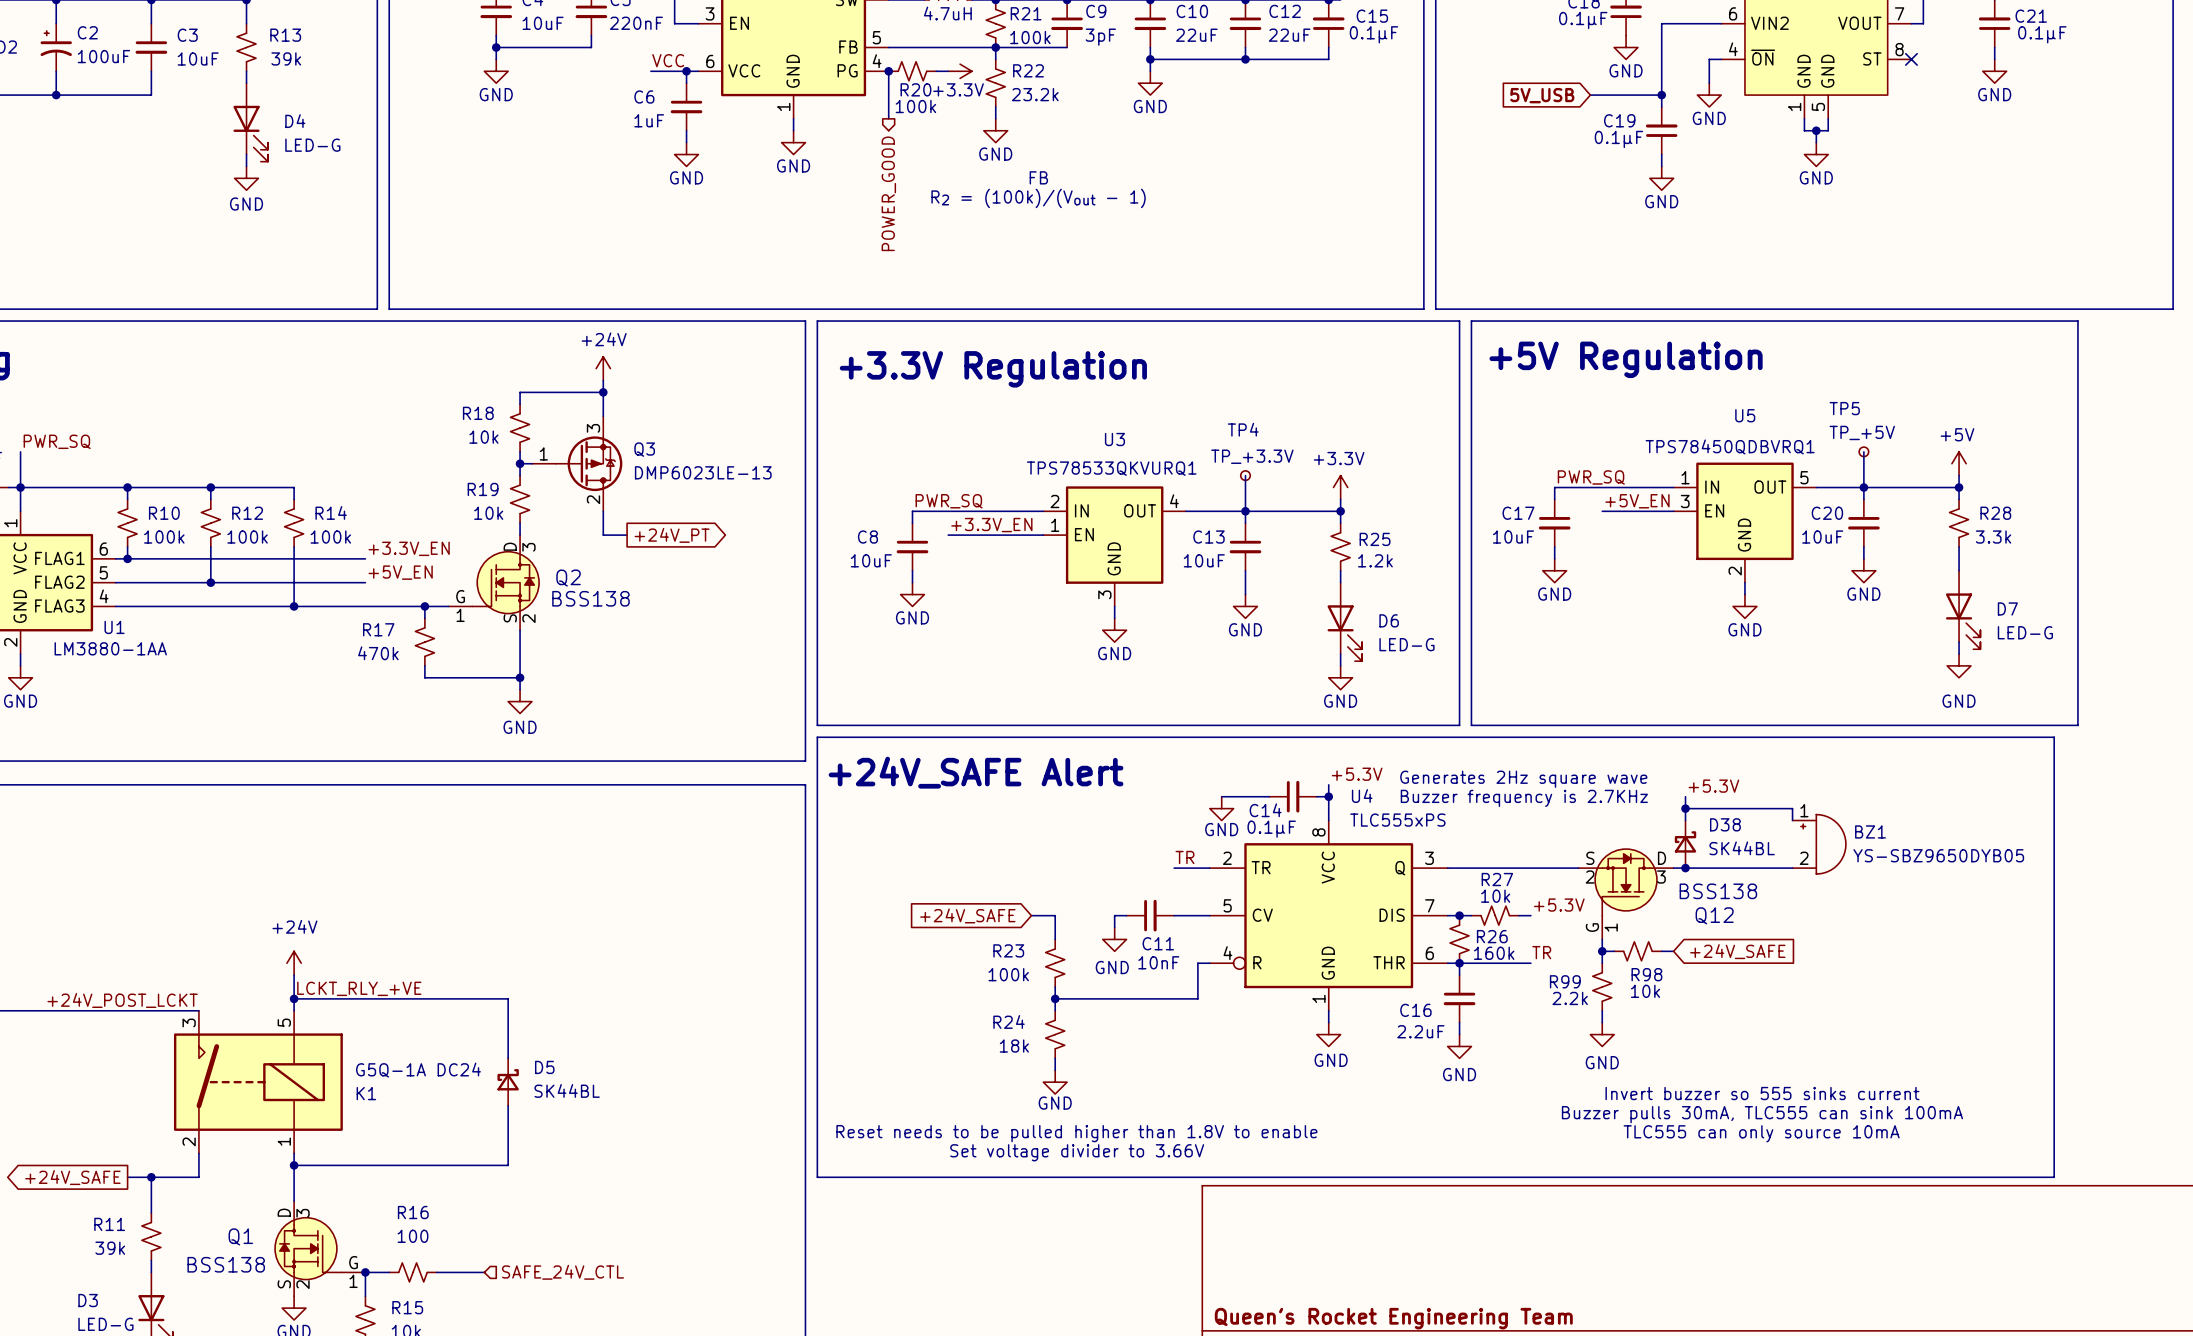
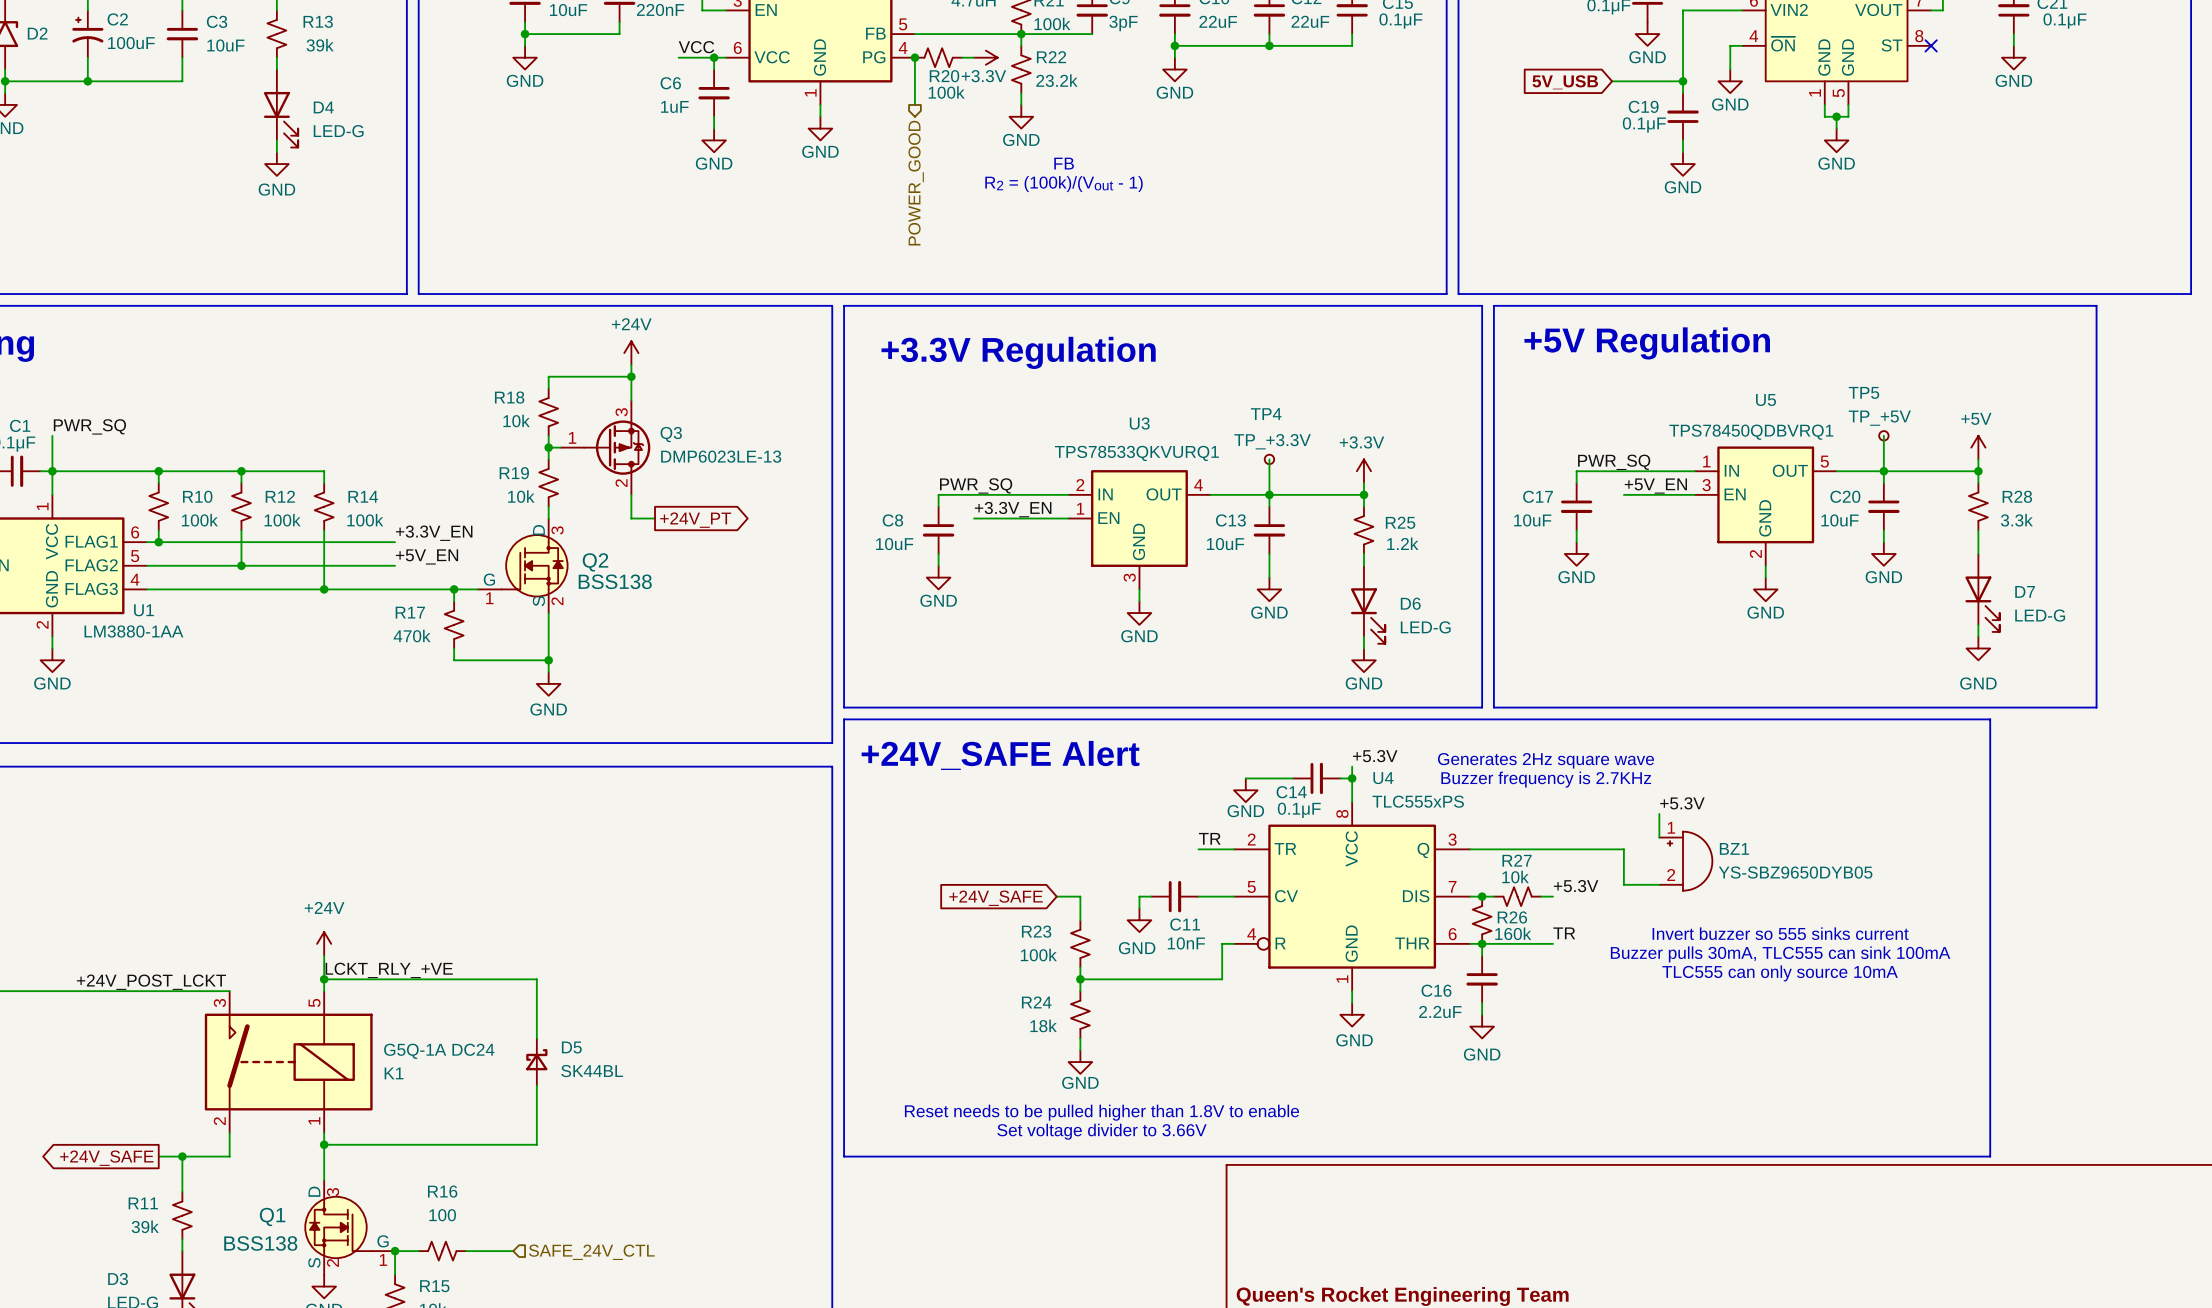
line: (1970, 737) (2054, 737) (2054, 1177) (1970, 1177) -> (1990, 719) (1990, 1156)
label position: +5.3V (1713, 786) -> +5.3V (1682, 803)
wire: (1685, 796) (1685, 820) -> (1659, 813) (1659, 837)
wire: (1685, 808) (1792, 808) (1792, 820) -> none
junction: (1685, 808) -> none
D38: SK44BL (1685, 844) -> none
BZ1 position: (1819, 844) -> (1685, 861)
wire: (1673, 868) (1792, 868) -> none
junction: (1685, 868) -> none
Q12: BSS138 (1626, 894) -> none
wire: (1602, 939) (1602, 963) -> none
junction: (1602, 951) -> none
R98: 10k (1637, 951) -> none
global label: +24V_SAFE (1737, 951) -> none
R99: 2.2k (1602, 987) -> none
wire: (1602, 1010) (1602, 1022) -> none
power symbol: GND (1602, 1034) -> none
text position: Invert buzzer so 555 sinks current (1762, 1093) -> Invert buzzer so 555 sinks current (1780, 933)
text position: Buzzer pulls 30mA, TLC555 can sink 100mA (1762, 1114) -> Buzzer pulls 30mA, TLC555 can sink 100mA (1780, 954)
text position: TLC555 can only source 10mA (1761, 1133) -> TLC555 can only source 10mA (1780, 973)

